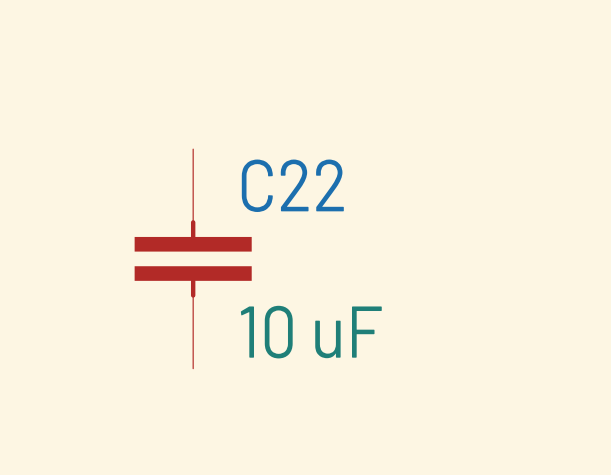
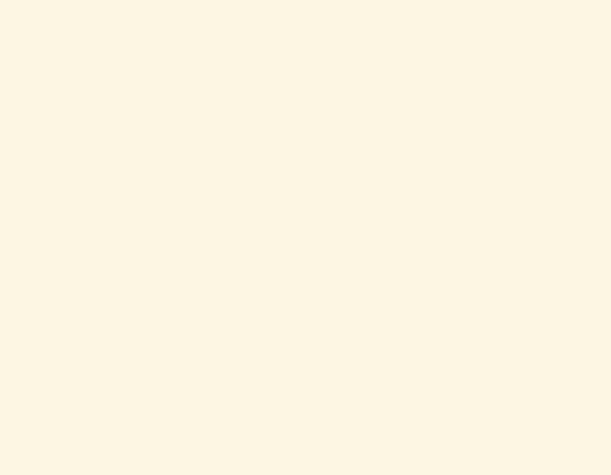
C22: 10 uF (193, 258) -> none

